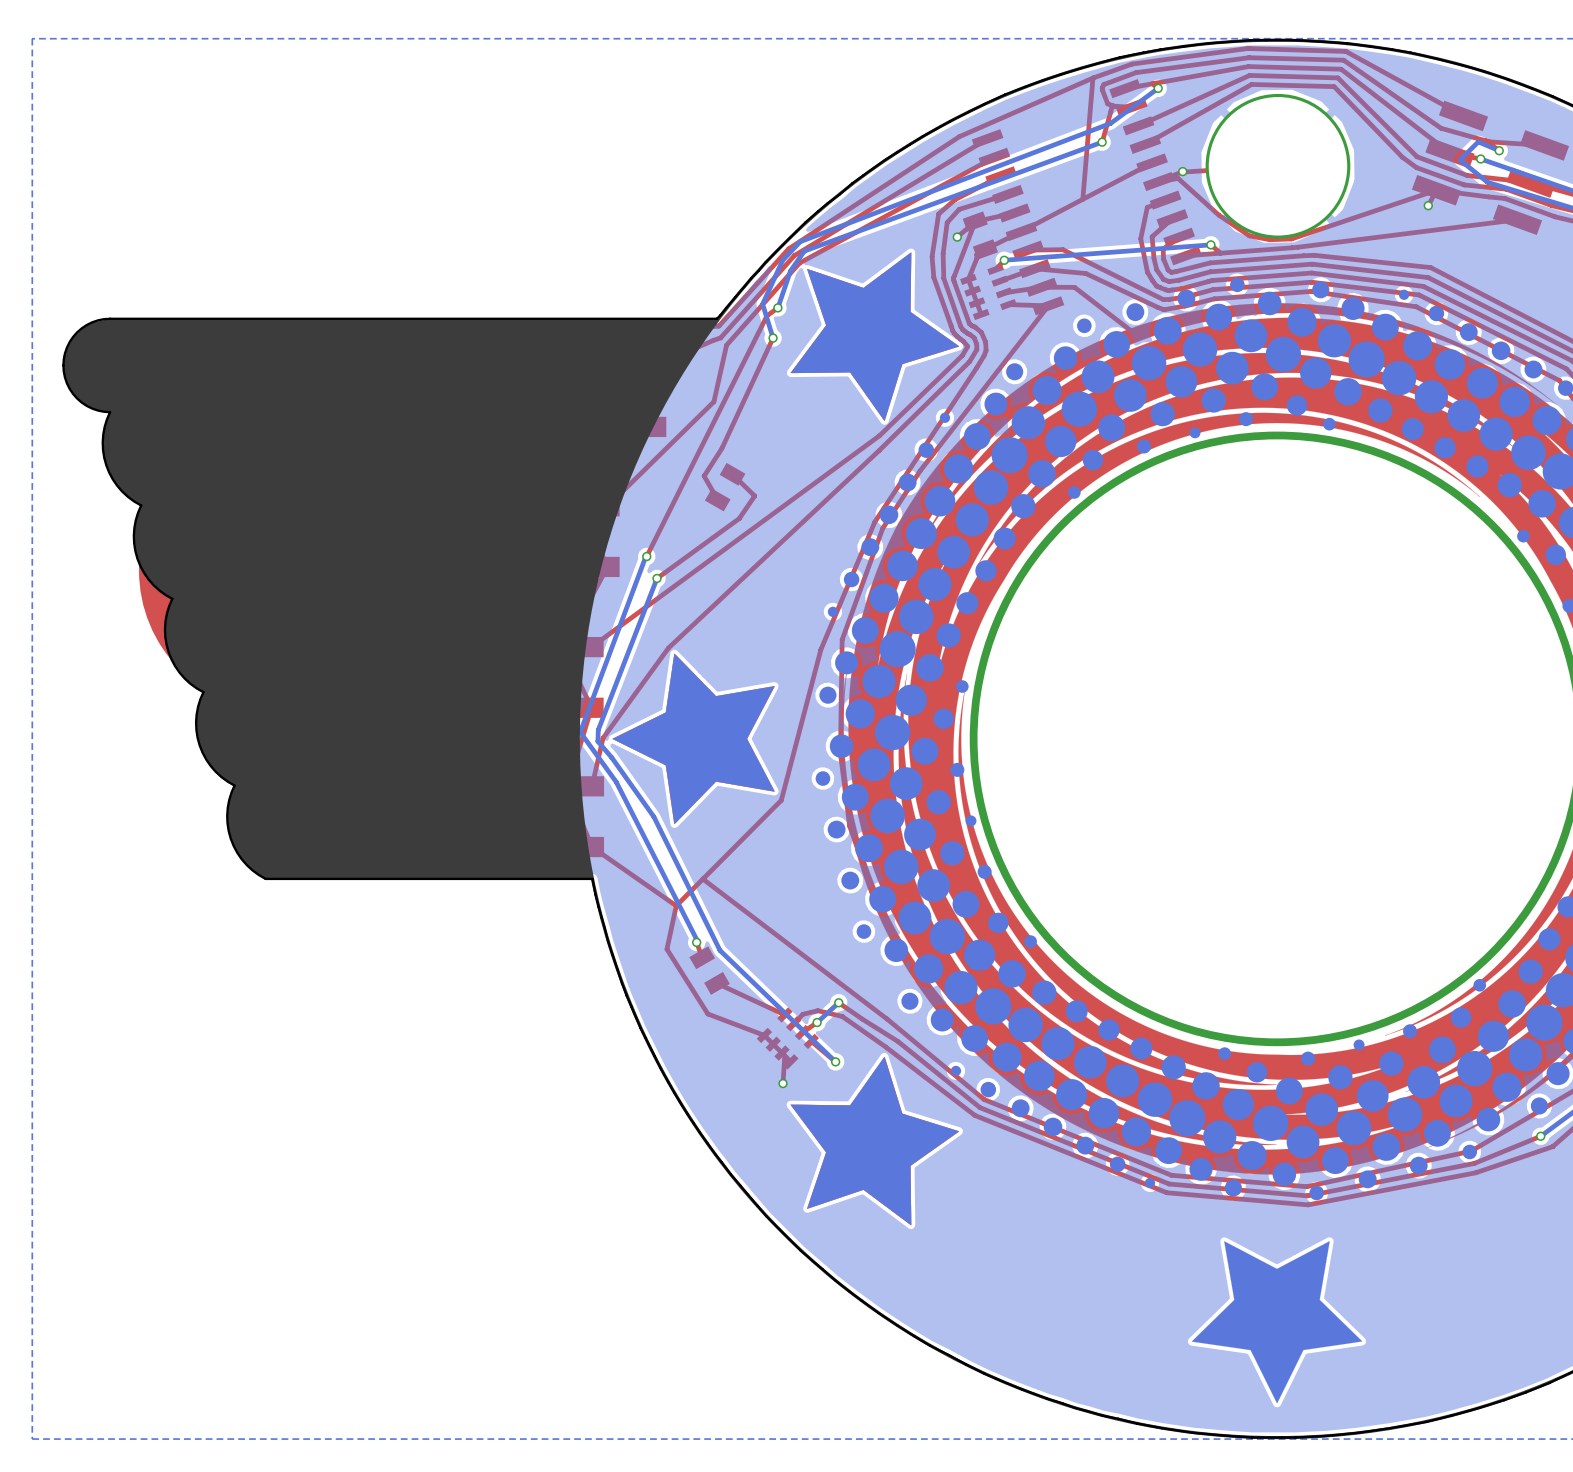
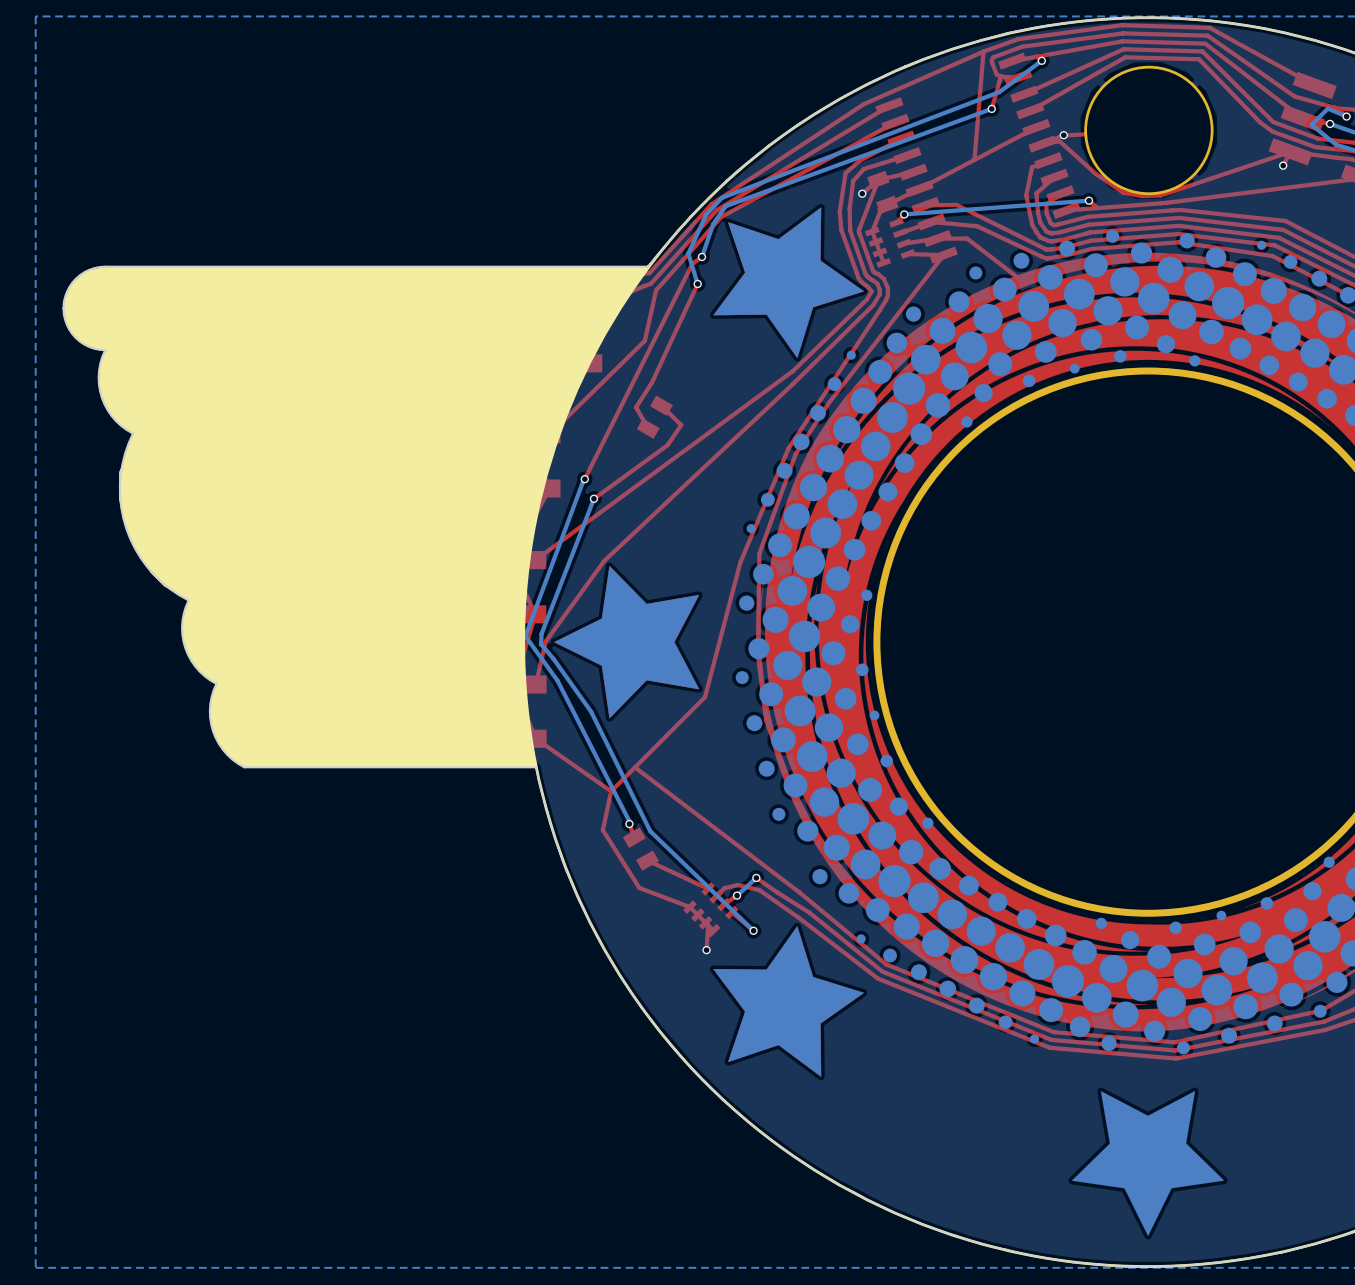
drawing shape: [63, 318, 717, 879] -> [63, 266, 648, 768]
board edge: (141, 505) (135, 520) (133, 535) (137, 558) (143, 572) (153, 585) (172, 598) (166, 613) (164, 628) (166, 644) (171, 659) (184, 678) (203, 692) -> (133, 433) (125, 453) (120, 474) (121, 507) (126, 528) (134, 548) (146, 566) (161, 582) (188, 600)

